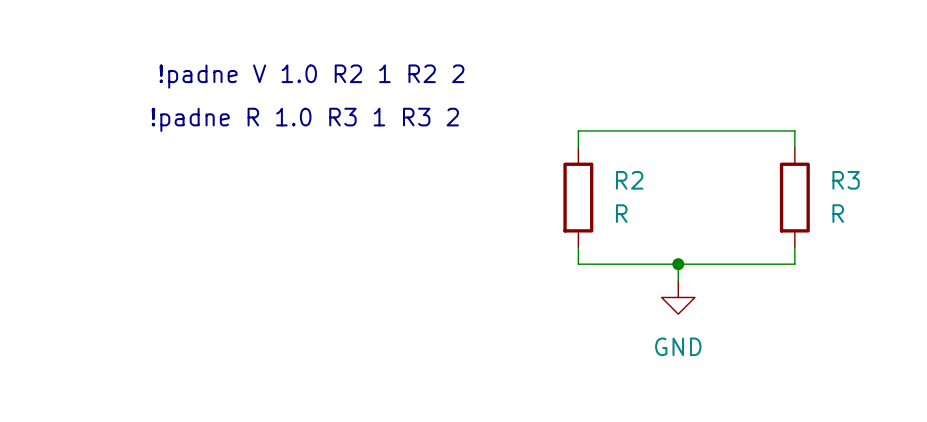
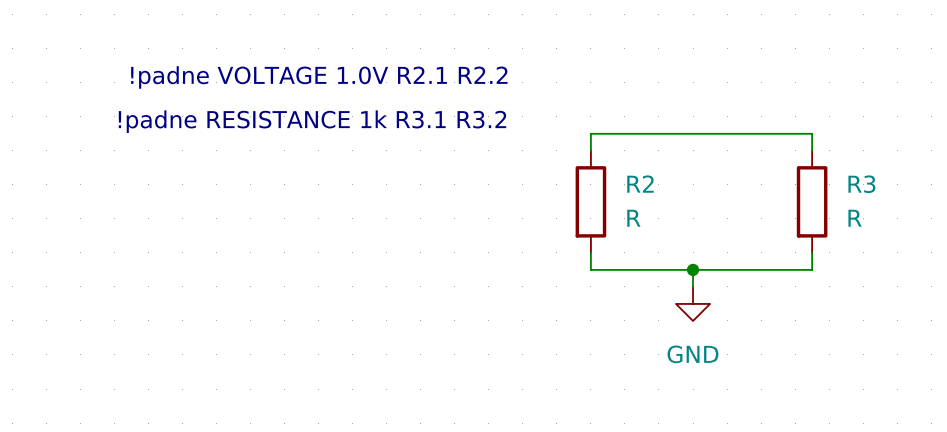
text: !padne V 1.0 R2 1 R2 2 (311, 76) -> !padne VOLTAGE 1.0V R2.1 R2.2 (319, 77)
text: !padne R 1.0 R3 1 R3 2 (305, 119) -> !padne RESISTANCE 1k R3.1 R3.2 (312, 121)

